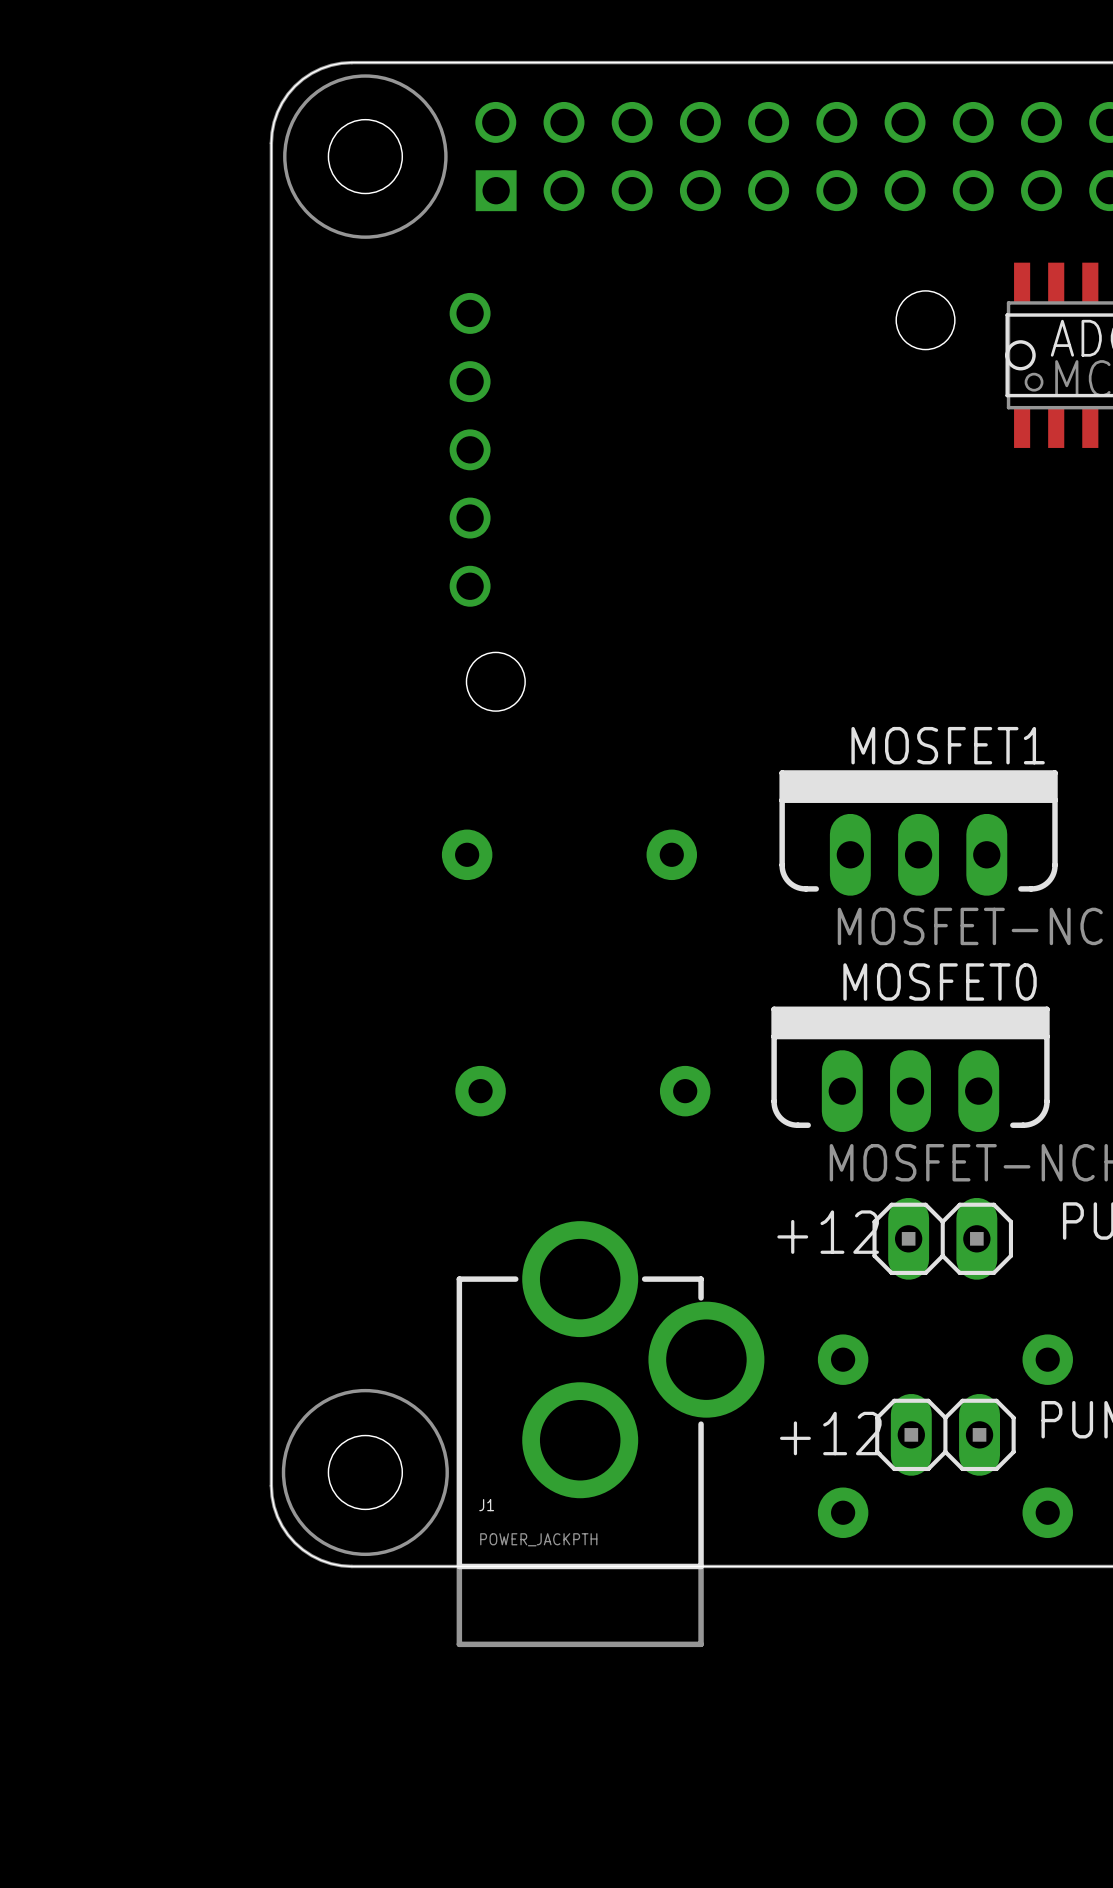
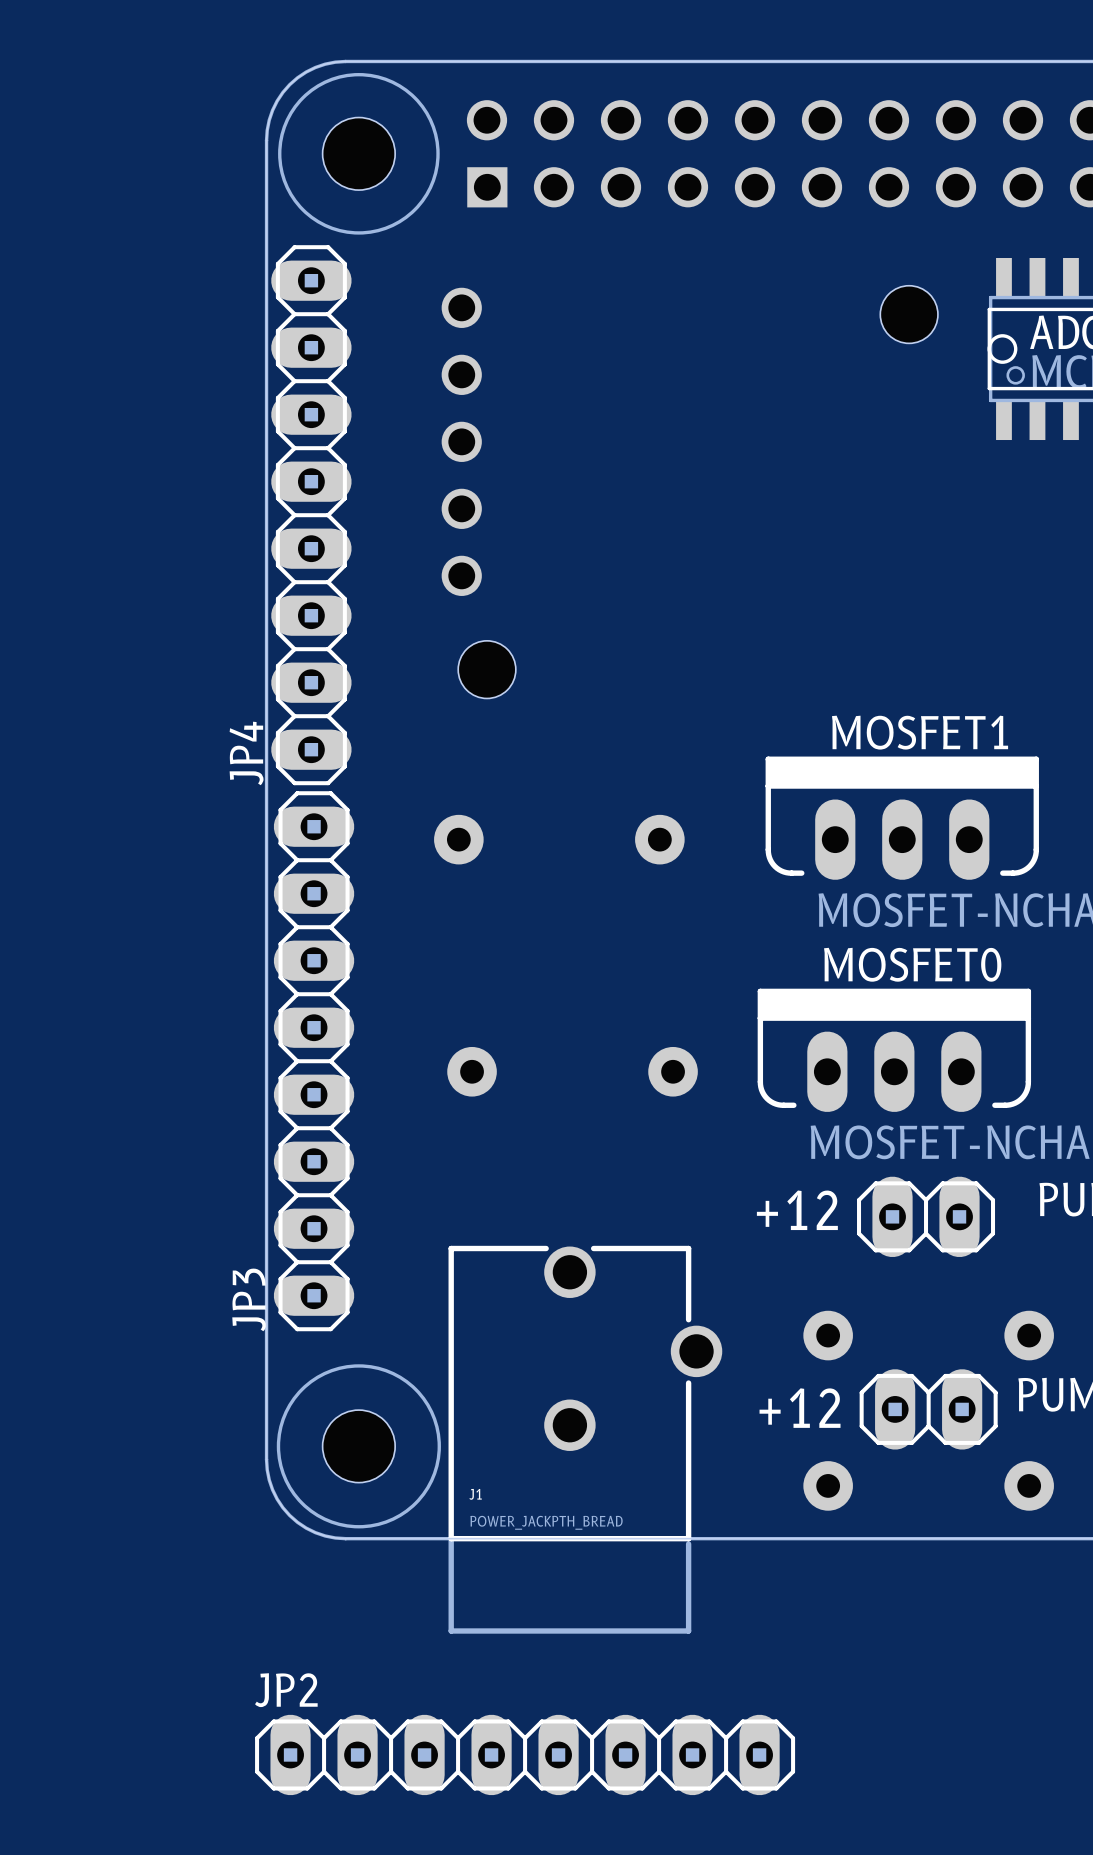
JP4: none -> (311, 515)
JP3: none -> (314, 1061)
J1 footprint: [456, 1221, 765, 1648] -> [448, 1245, 723, 1634]
J1 value: POWER_JACKPTH (538, 1539) -> POWER_JACKPTH_BREAD (546, 1522)
JP2: none -> (525, 1754)

